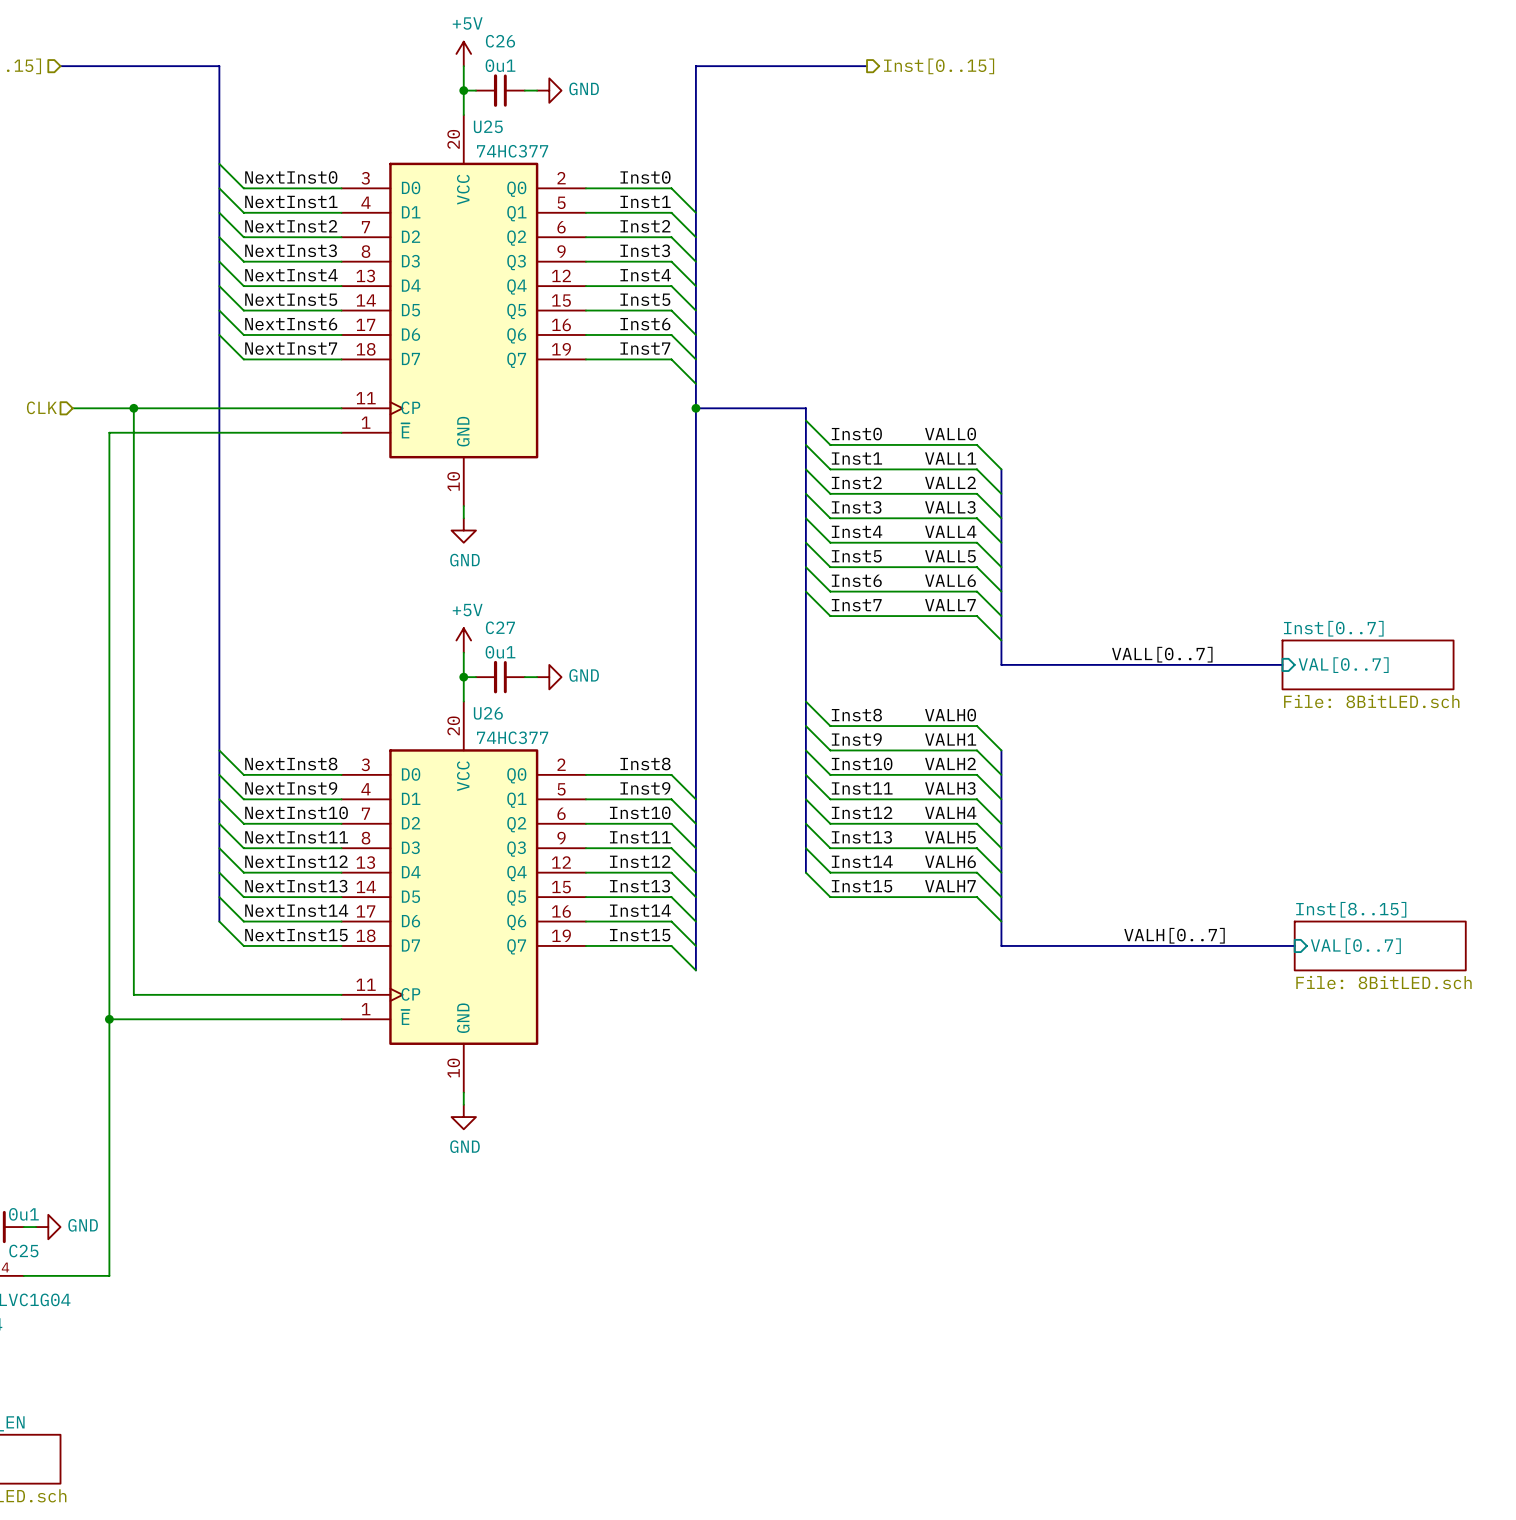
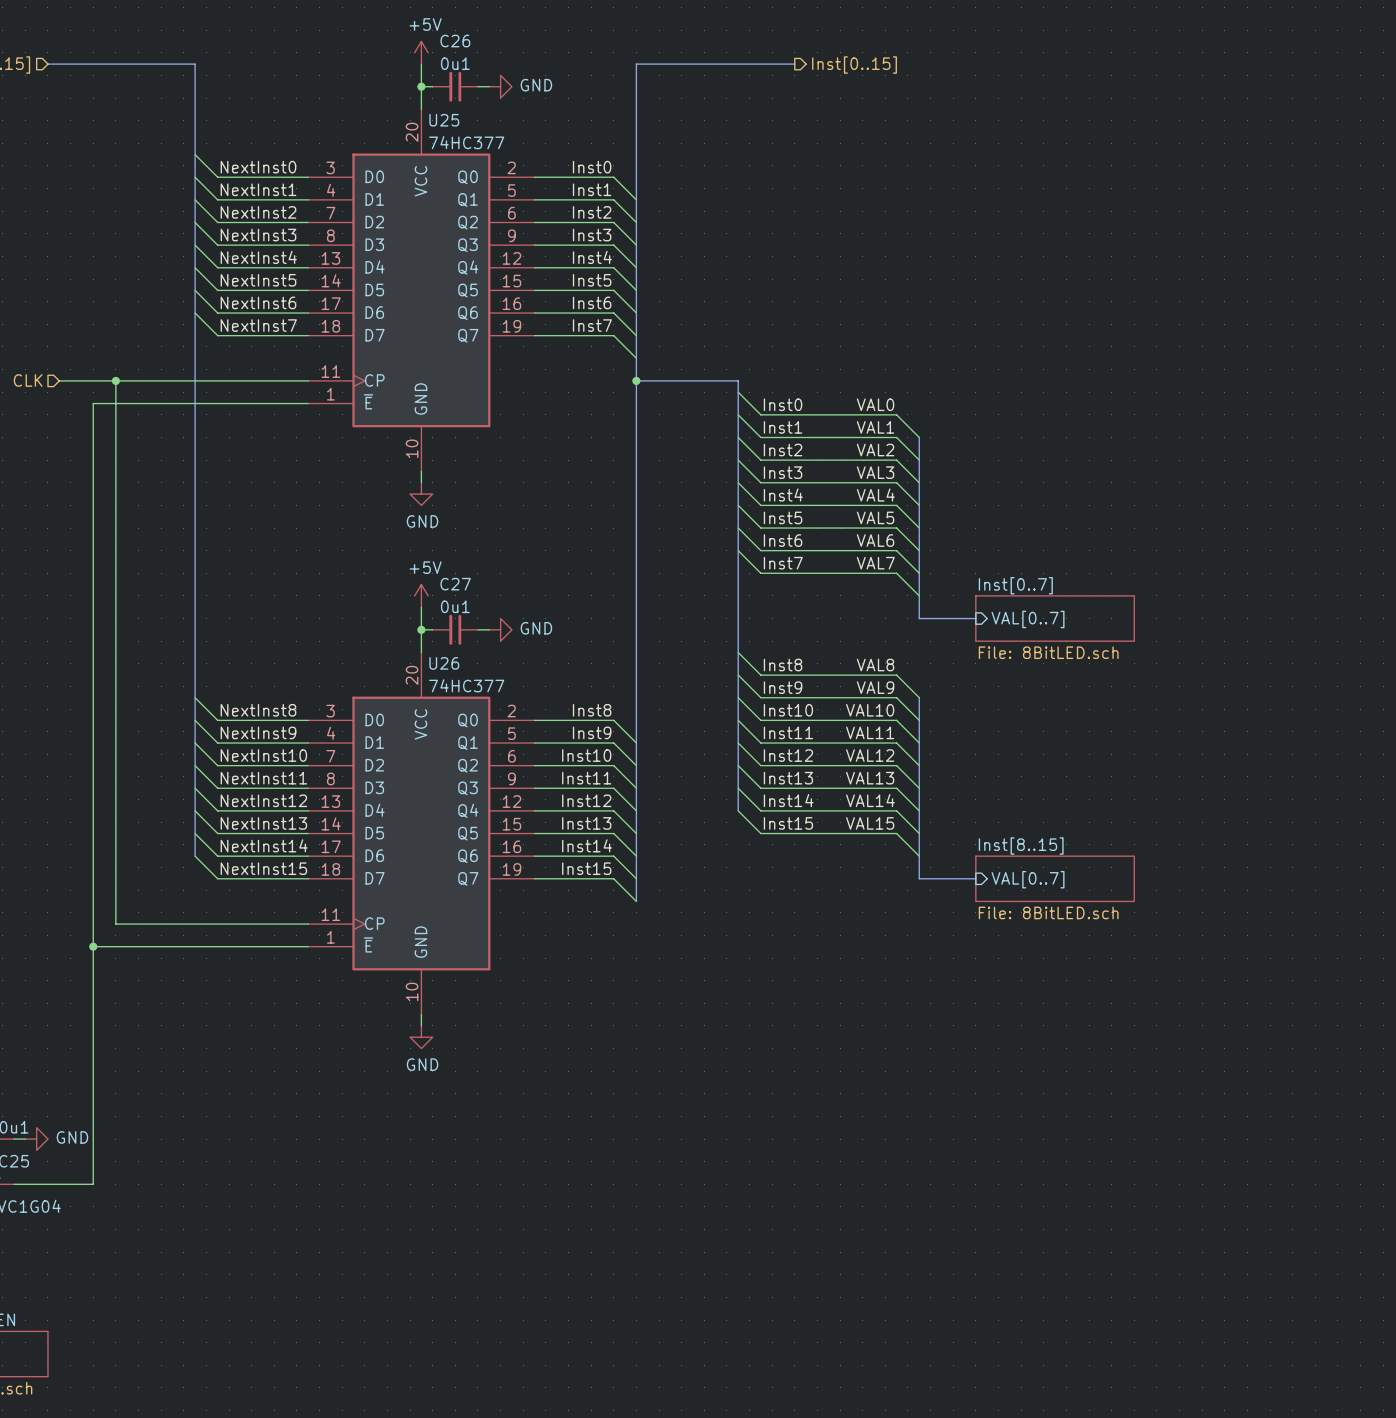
label: VALL0 (950, 434) -> VAL0 (875, 404)
label: VALL1 (950, 458) -> VAL1 (875, 427)
label: VALL2 (950, 482) -> VAL2 (875, 450)
label: VALL3 (950, 507) -> VAL3 (875, 472)
label: VALL4 (950, 531) -> VAL4 (875, 495)
label: VALL5 (950, 556) -> VAL5 (875, 517)
label: VALL6 (950, 580) -> VAL6 (875, 540)
label: VALL7 (950, 605) -> VAL7 (875, 563)
label: VALL[0..7] (1162, 654) -> none
bus: (1062, 664) (1282, 664) -> none
sheet Inst[0..7] position: (1368, 664) -> (1055, 618)
sheet pin: none -> VAL[0..7] (1028, 619)
sheet pin: VAL[0..7] (1343, 665) -> none
label: VALH0 (950, 715) -> VAL8 (875, 665)
label: VALH1 (950, 739) -> VAL9 (875, 687)
label: VALH2 (950, 763) -> VAL10 (870, 710)
label: VALH3 (950, 788) -> VAL11 (870, 732)
label: VALH4 (950, 812) -> VAL12 (870, 755)
label: VALH5 (950, 837) -> VAL13 (870, 778)
label: VALH6 (950, 861) -> VAL14 (870, 800)
label: VALH7 (950, 886) -> VAL15 (870, 823)
label: VALH[0..7] (1174, 935) -> none
bus: (1062, 945) (1294, 945) -> none
sheet Inst[8..15] position: (1380, 945) -> (1055, 878)
sheet pin: none -> VAL[0..7] (1028, 879)
sheet pin: VAL[0..7] (1355, 946) -> none

